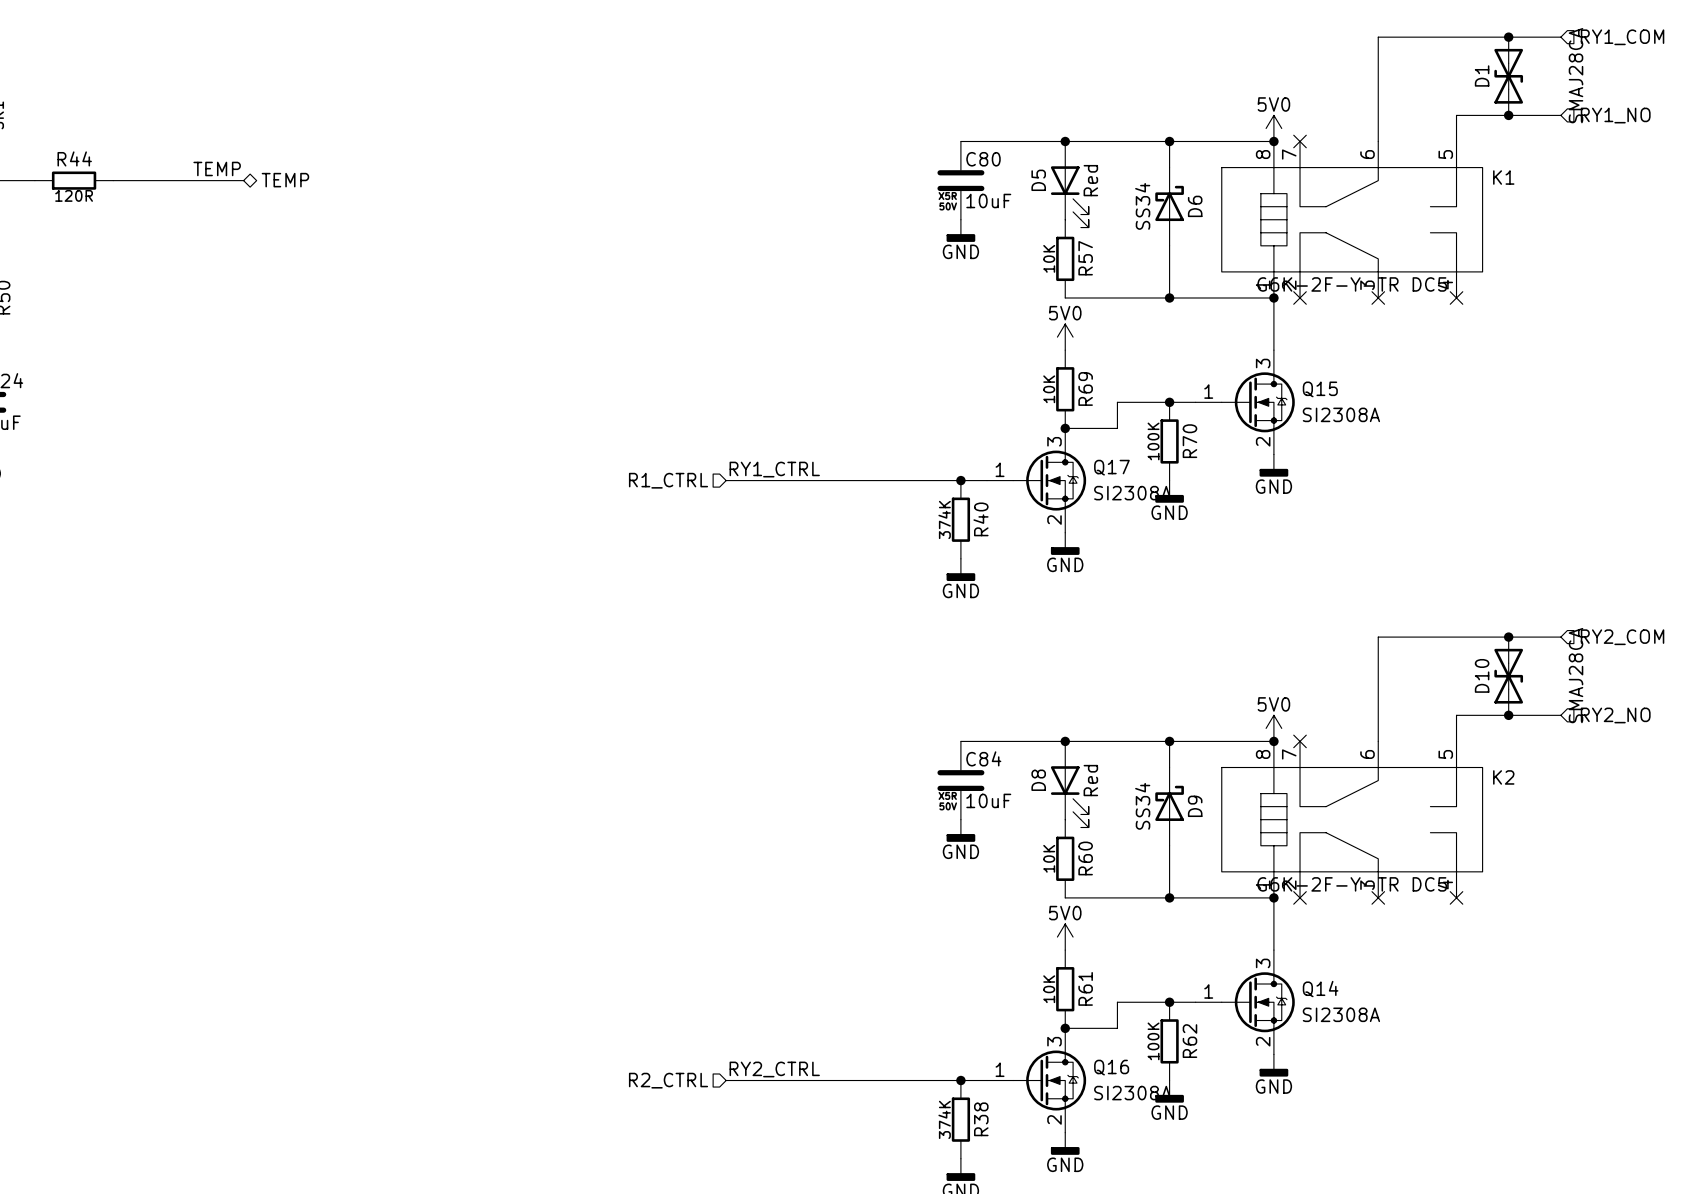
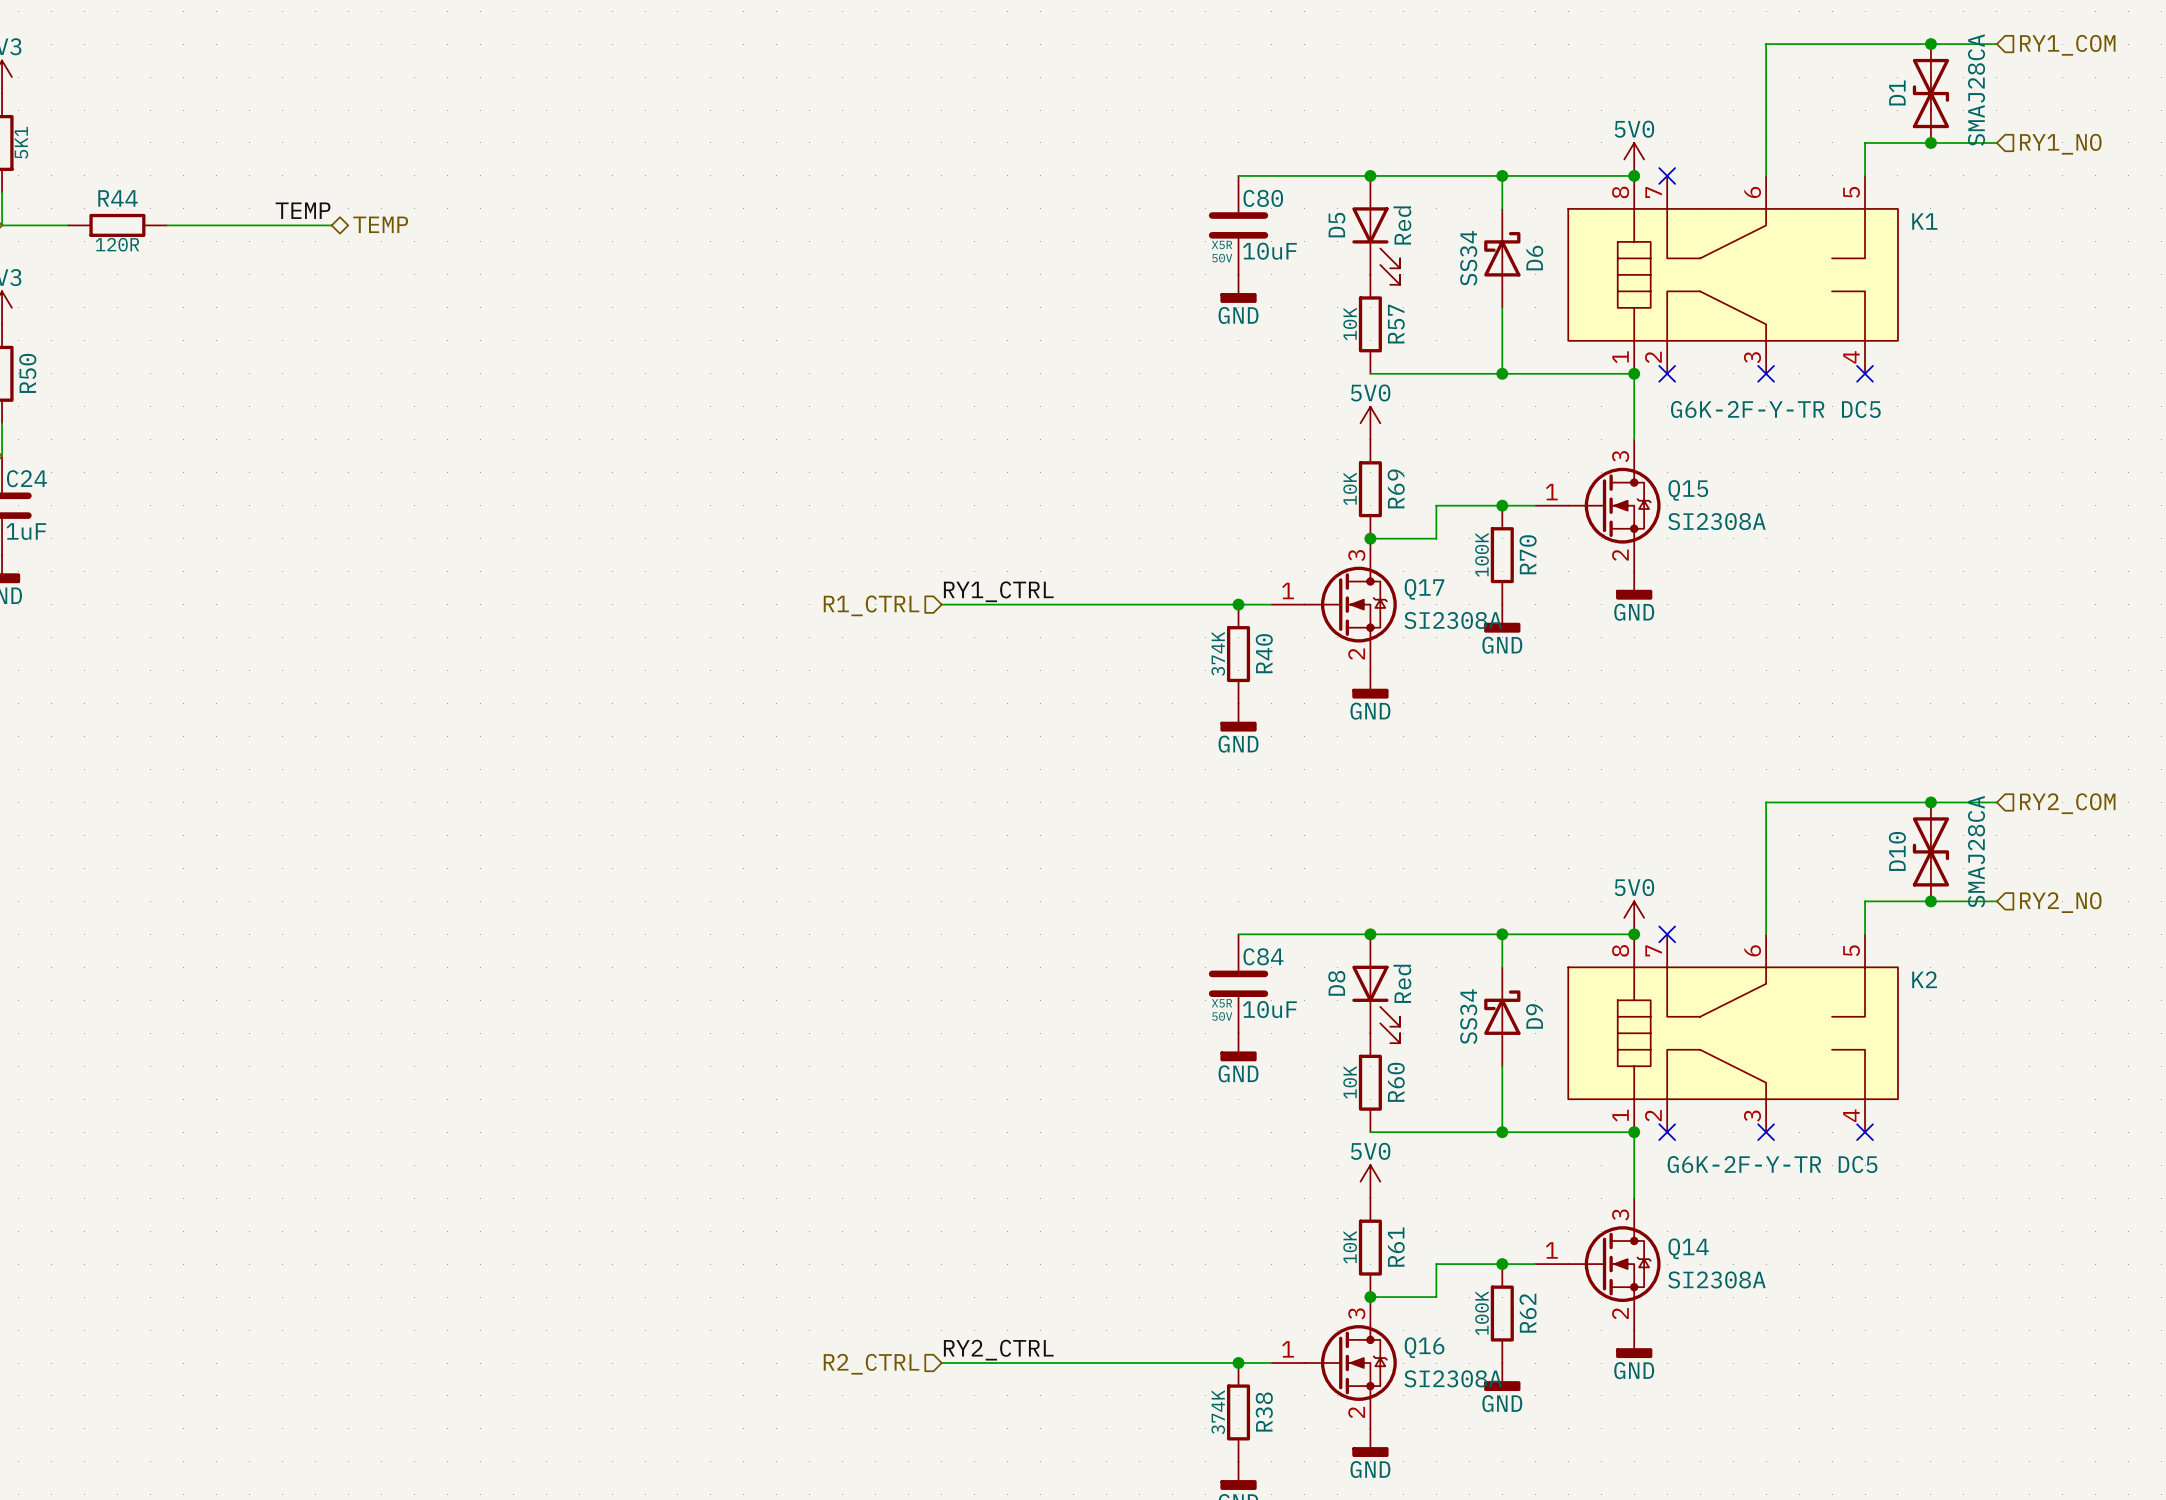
D1 value position: SMAJ28CA (1576, 75) -> SMAJ28CA (1976, 90)
K1 value position: G6K-2F-Y-TR DC5 (1352, 284) -> G6K-2F-Y-TR DC5 (1775, 409)
D10 value position: SMAJ28CA (1576, 675) -> SMAJ28CA (1976, 851)
K2 value position: G6K-2F-Y-TR DC5 (1352, 884) -> G6K-2F-Y-TR DC5 (1772, 1164)

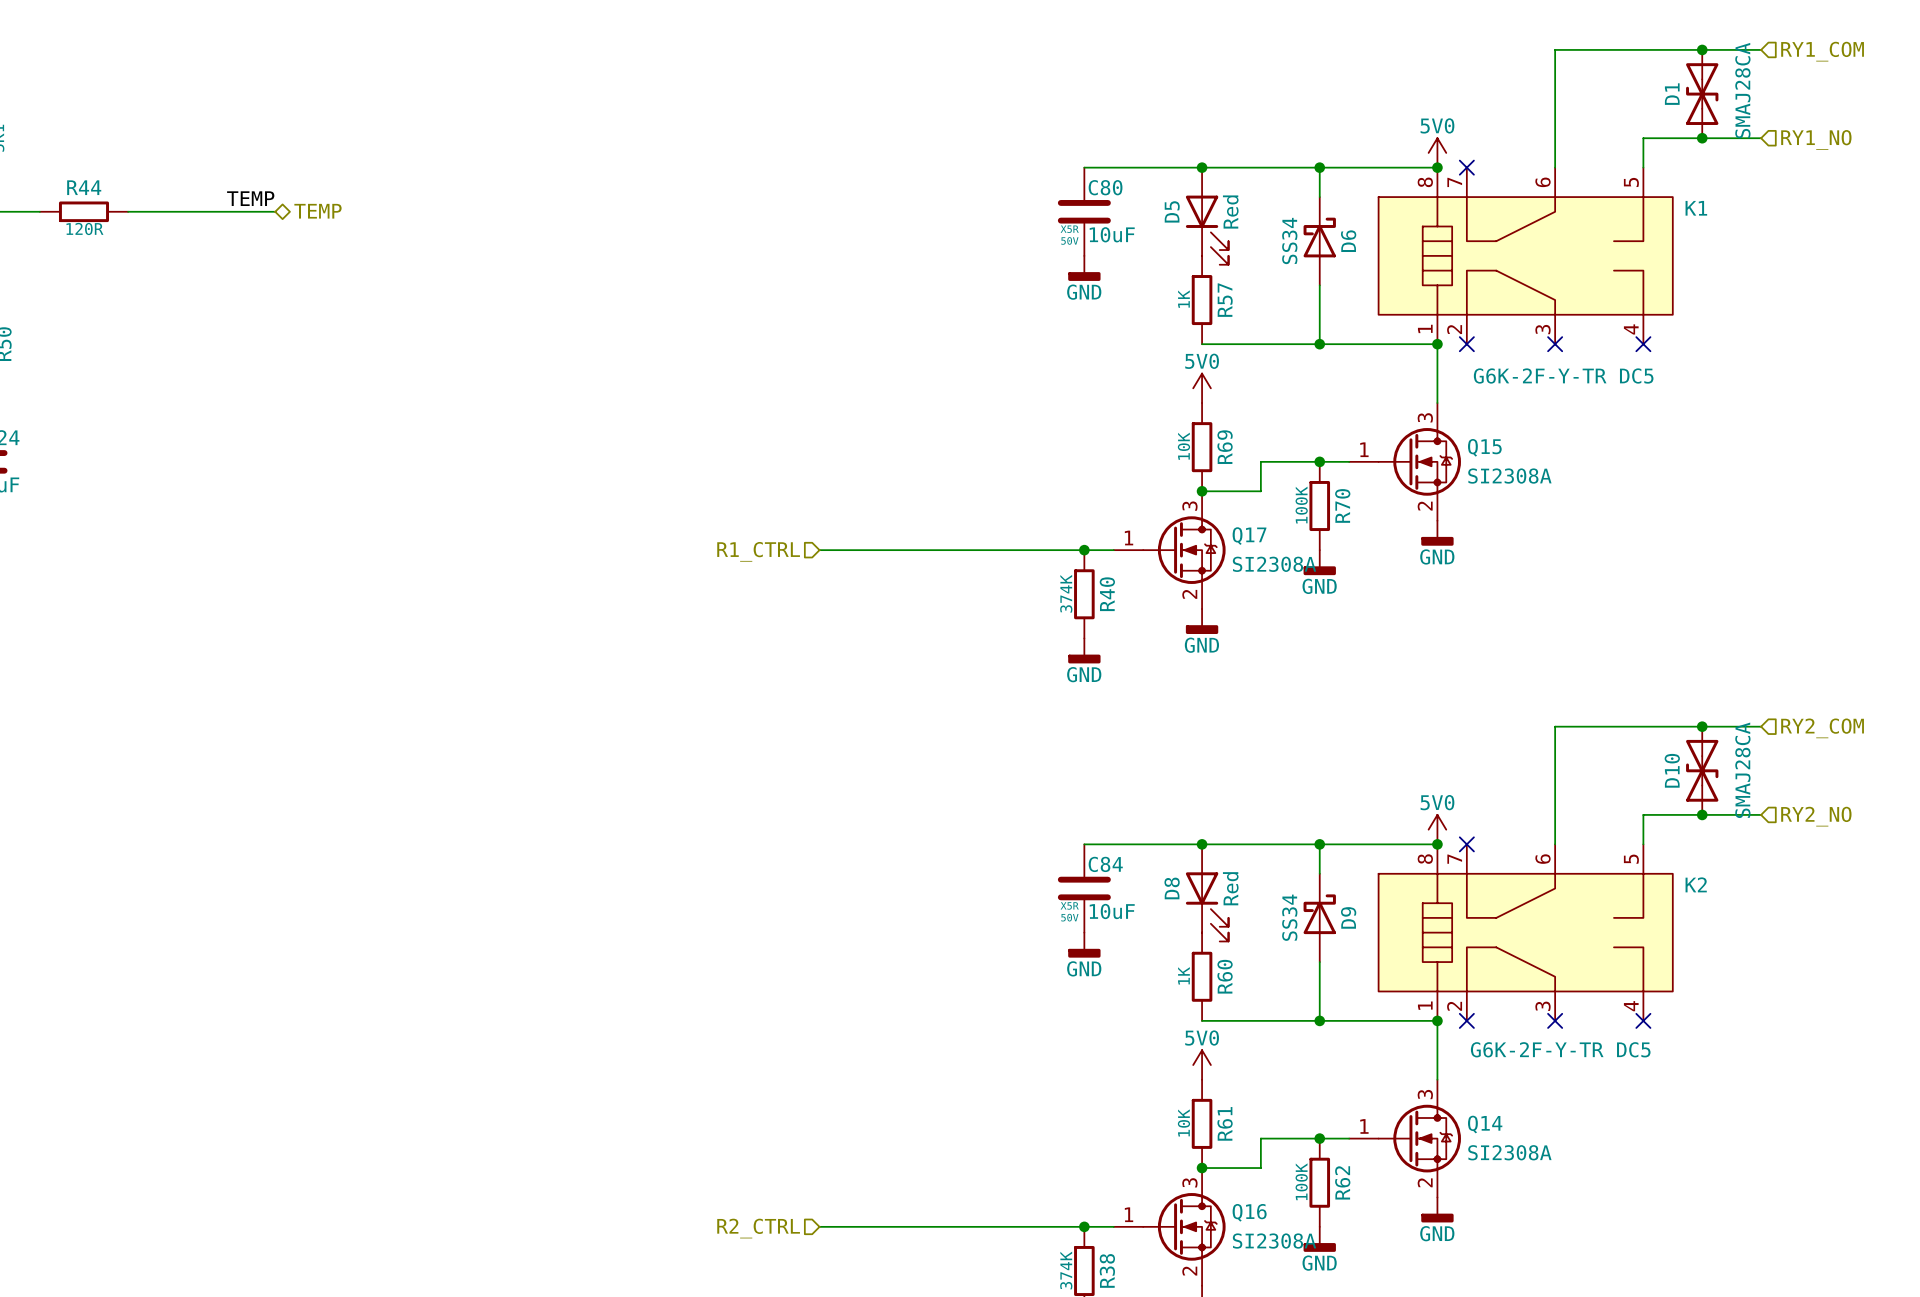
R57 value: 10K (1350, 324) -> 1K (1183, 299)
label: RY1_CTRL (998, 591) -> none
R60 value: 10K (1350, 1082) -> 1K (1183, 975)
label: RY2_CTRL (998, 1350) -> none

